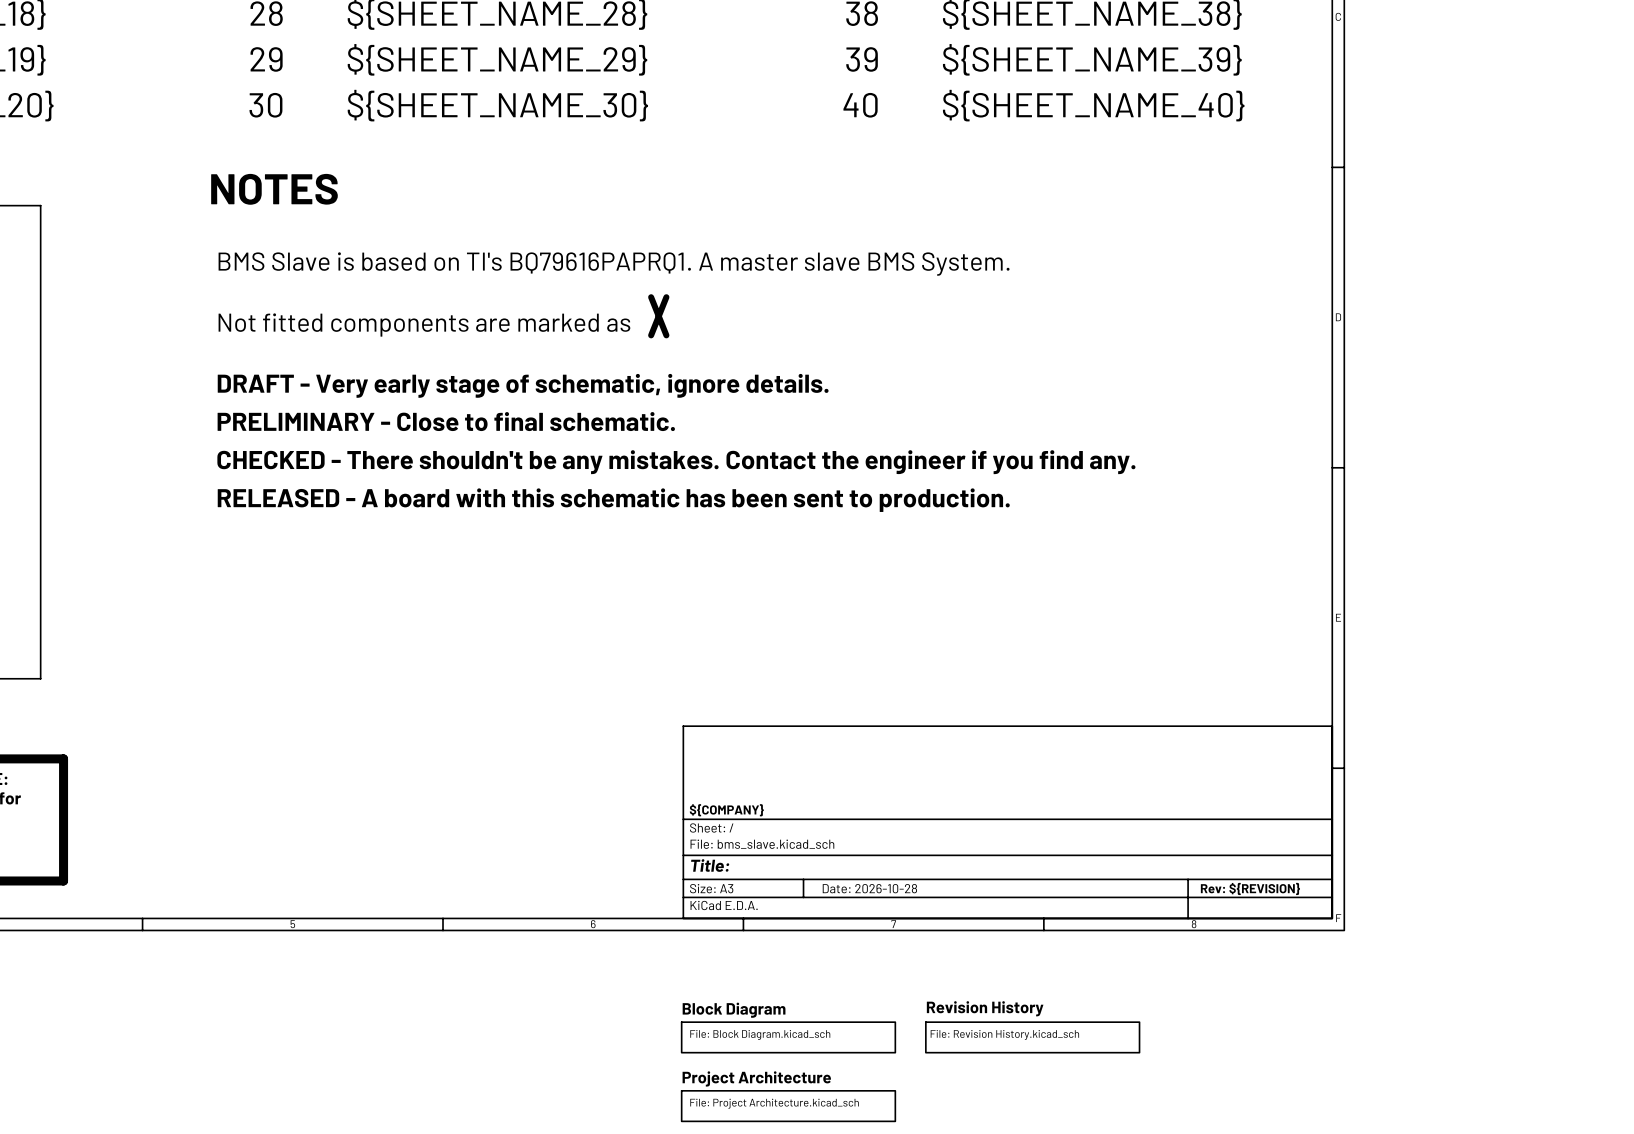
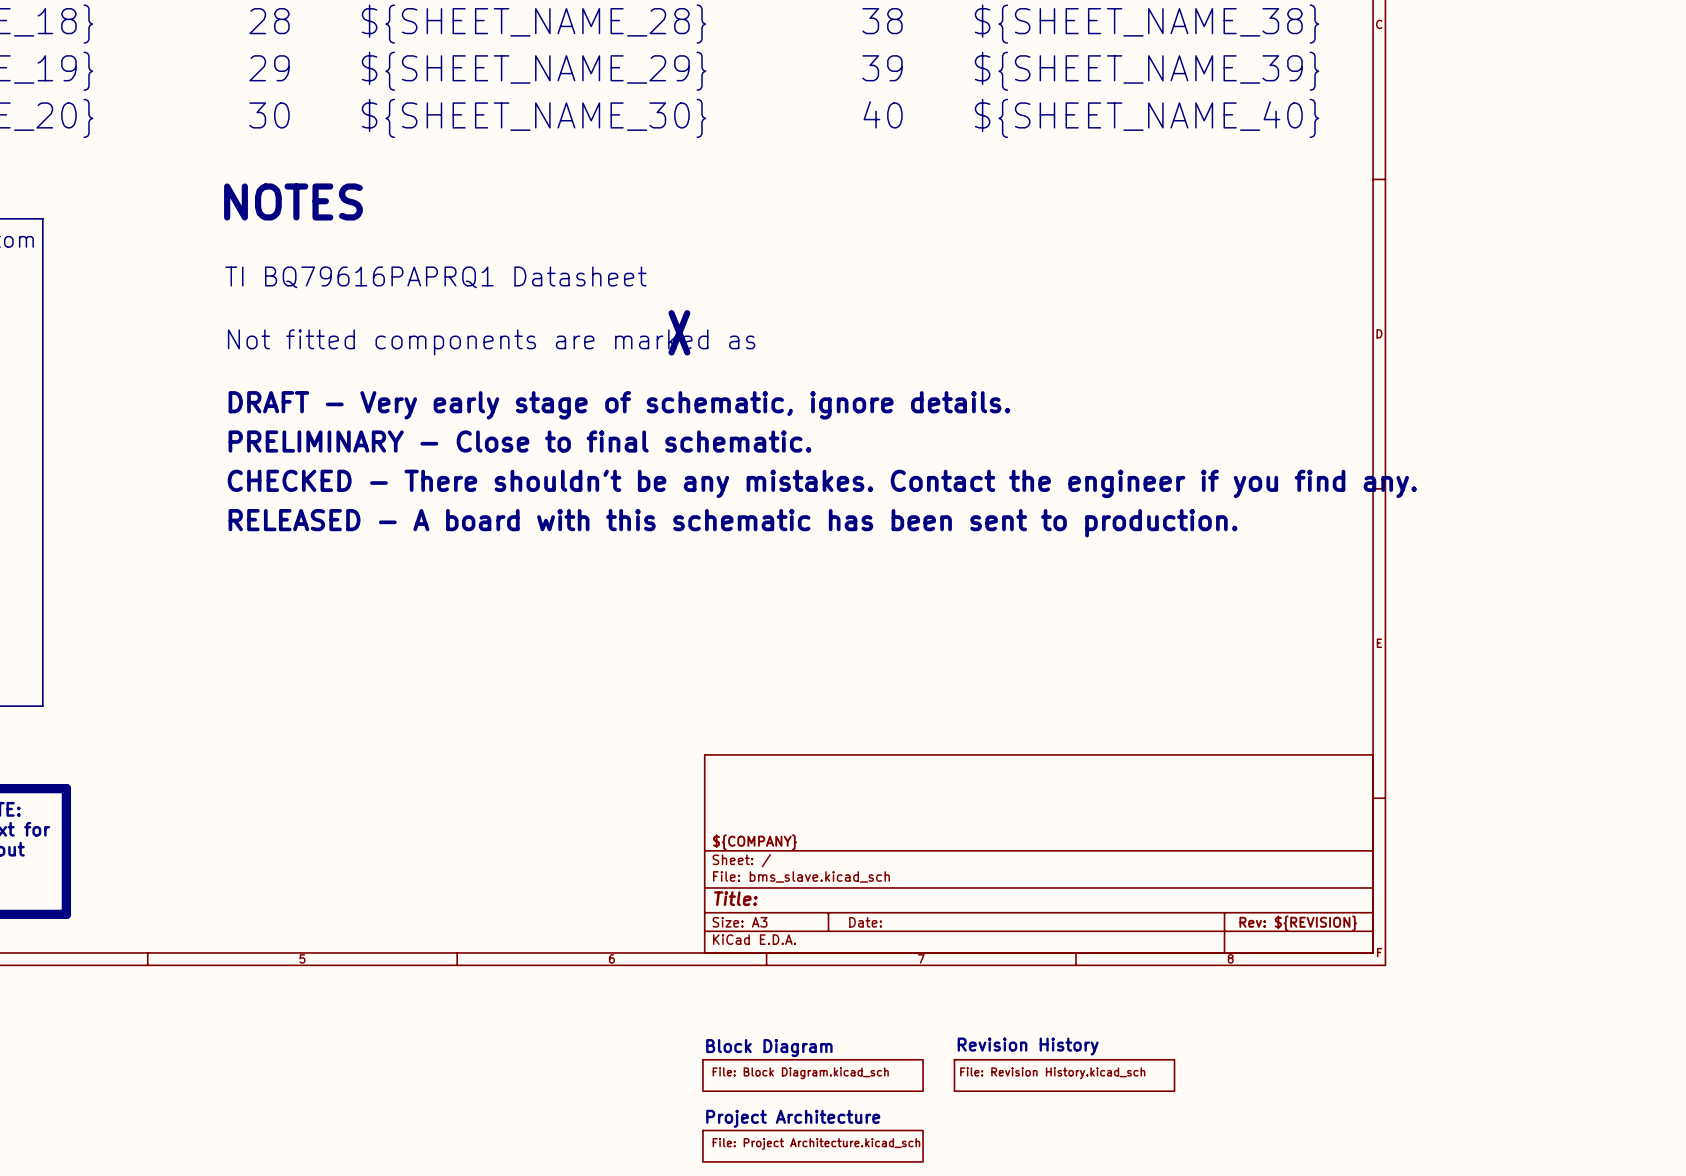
text: BMS Slave is based on TI's BQ79616PAPRQ1. A master slave BMS System. (614, 264) -> TI BQ79616PAPRQ1 Datasheet (435, 277)
title block: Date: 2026-10-28 (869, 888) -> Date: (865, 922)

